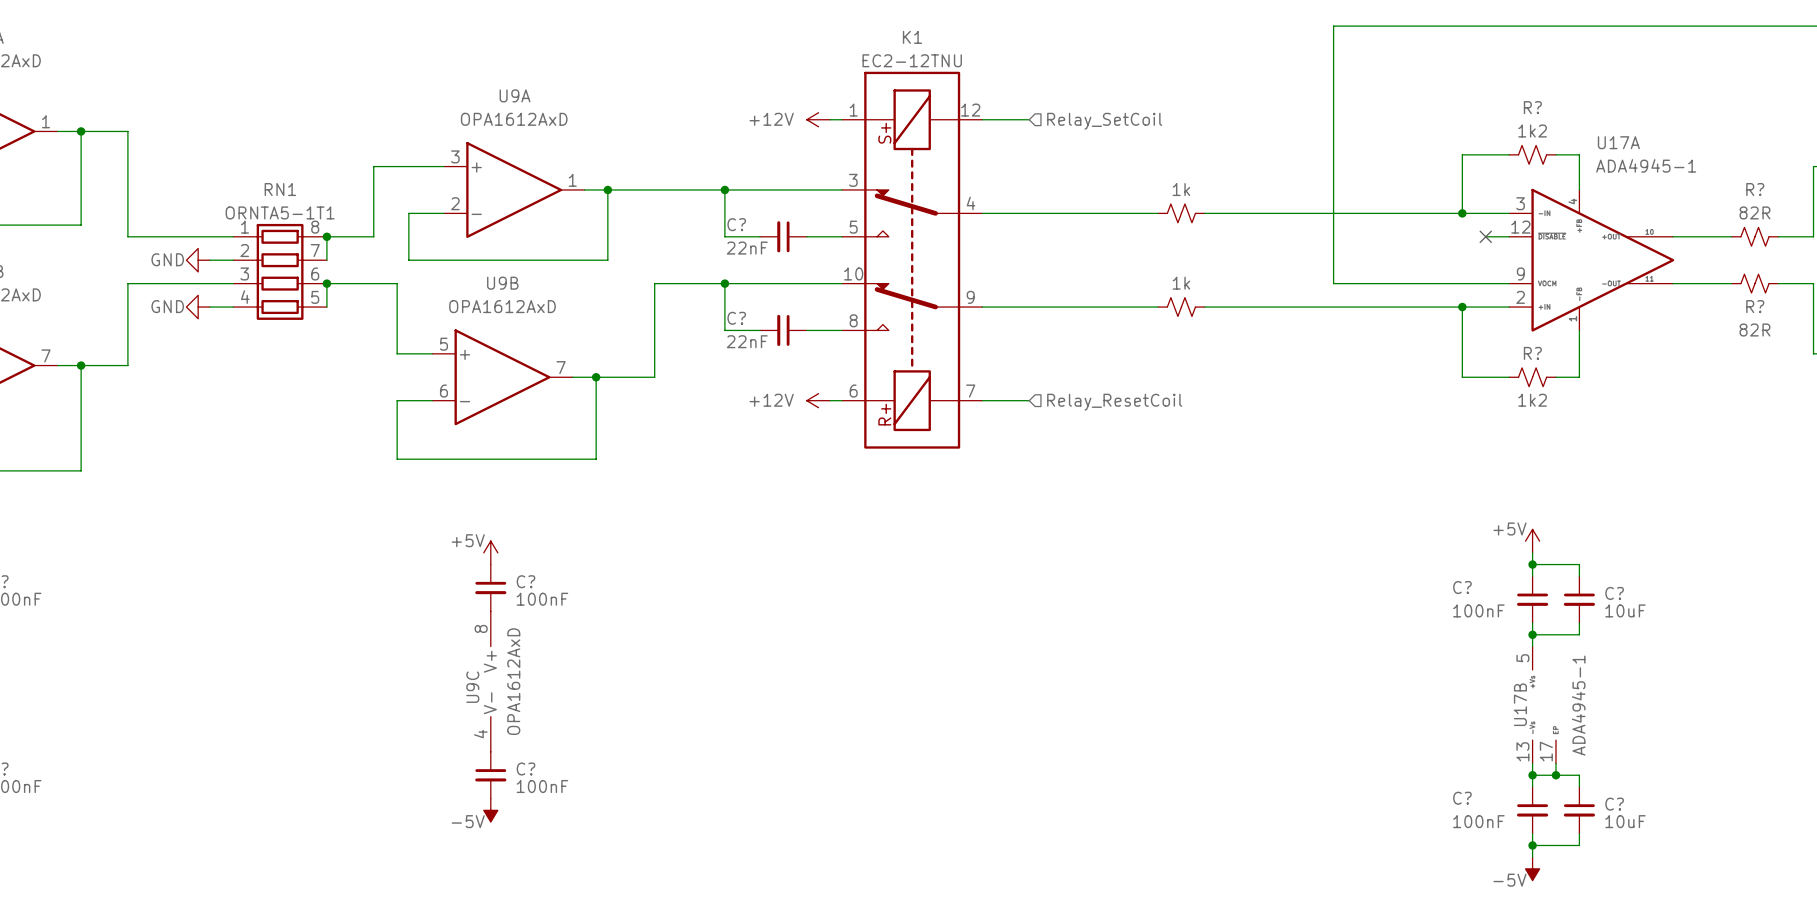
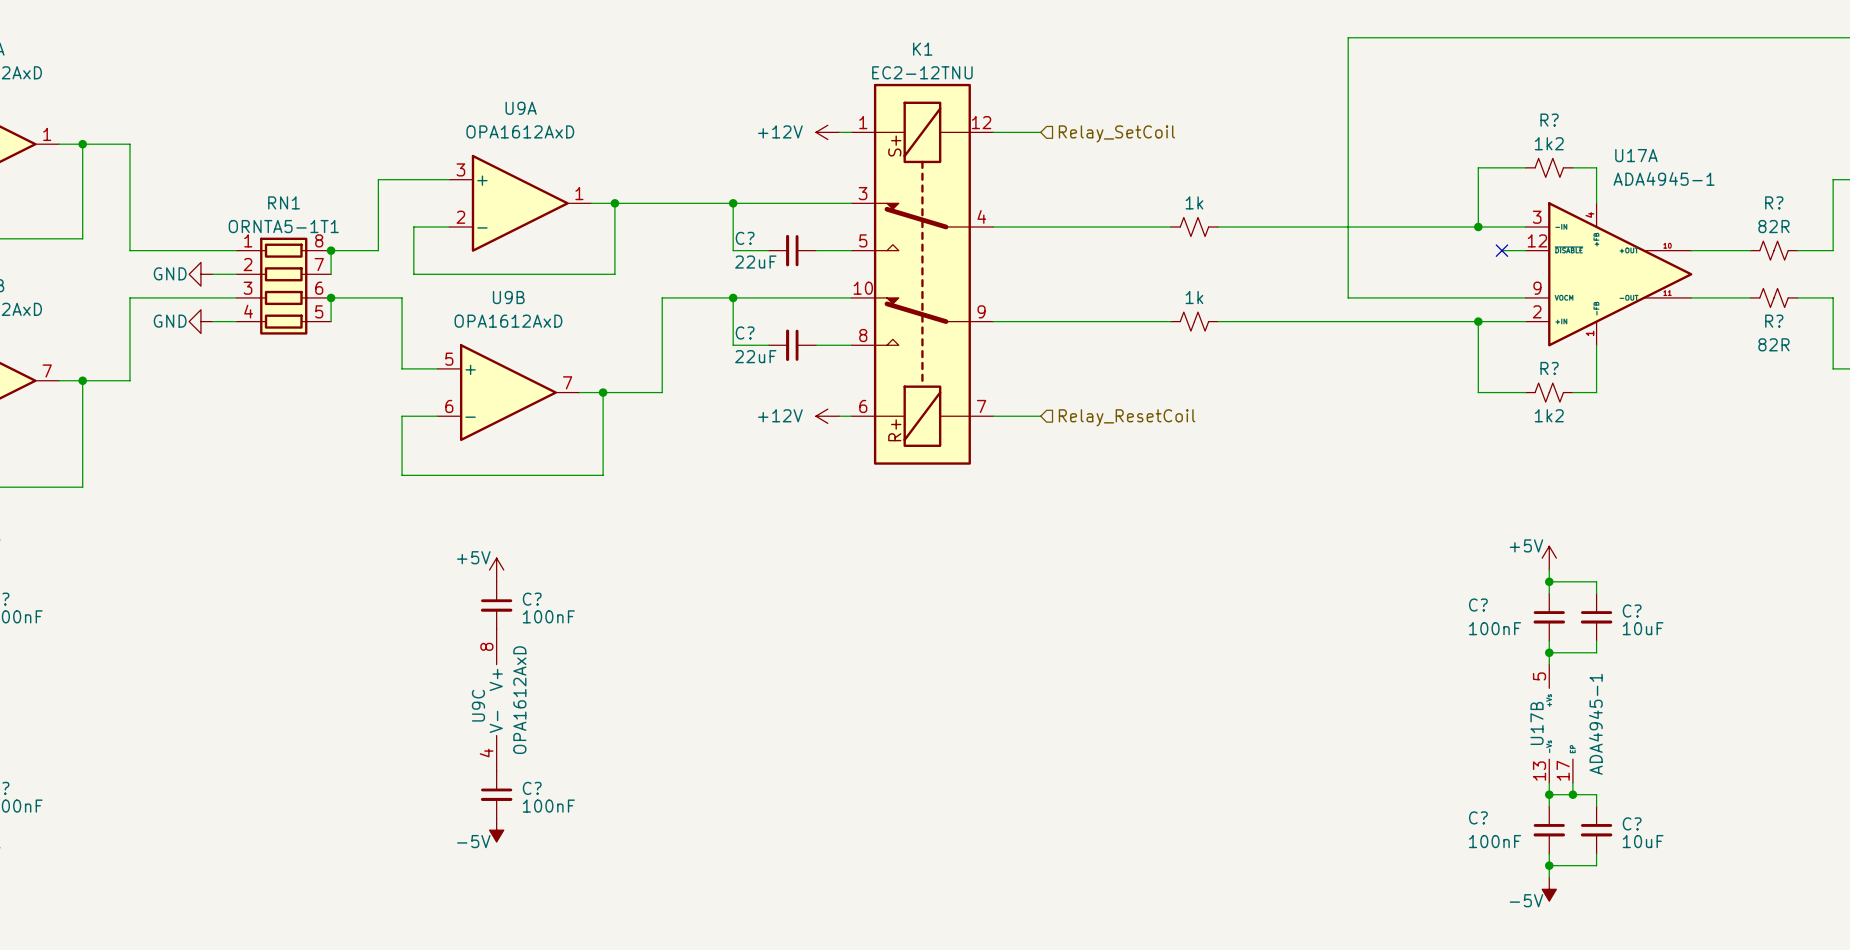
C? value: 22nF (747, 248) -> 22uF (755, 262)
C? value: 22nF (747, 341) -> 22uF (755, 356)

